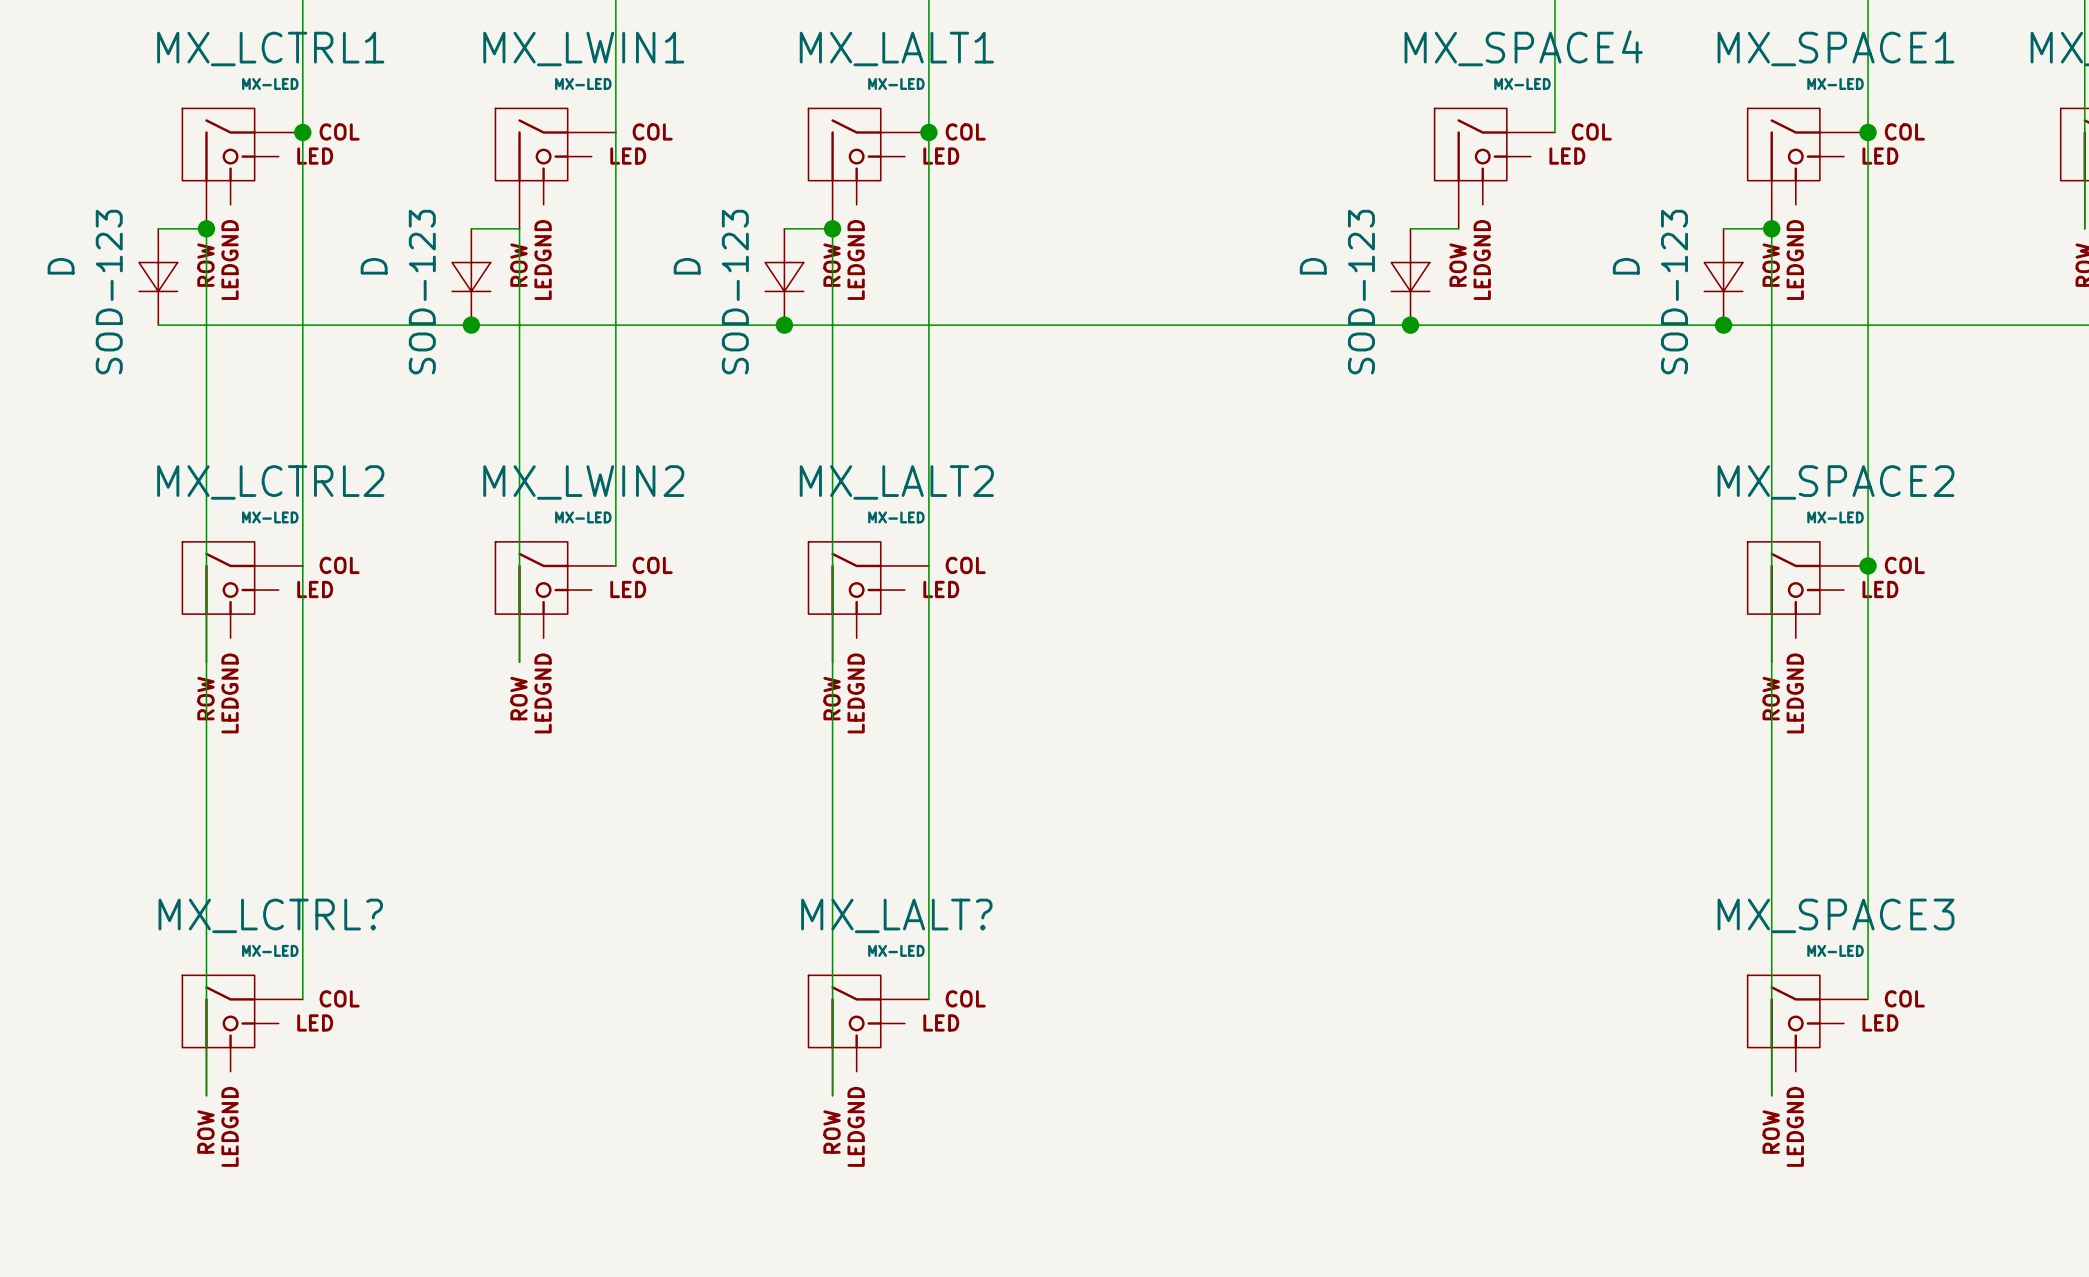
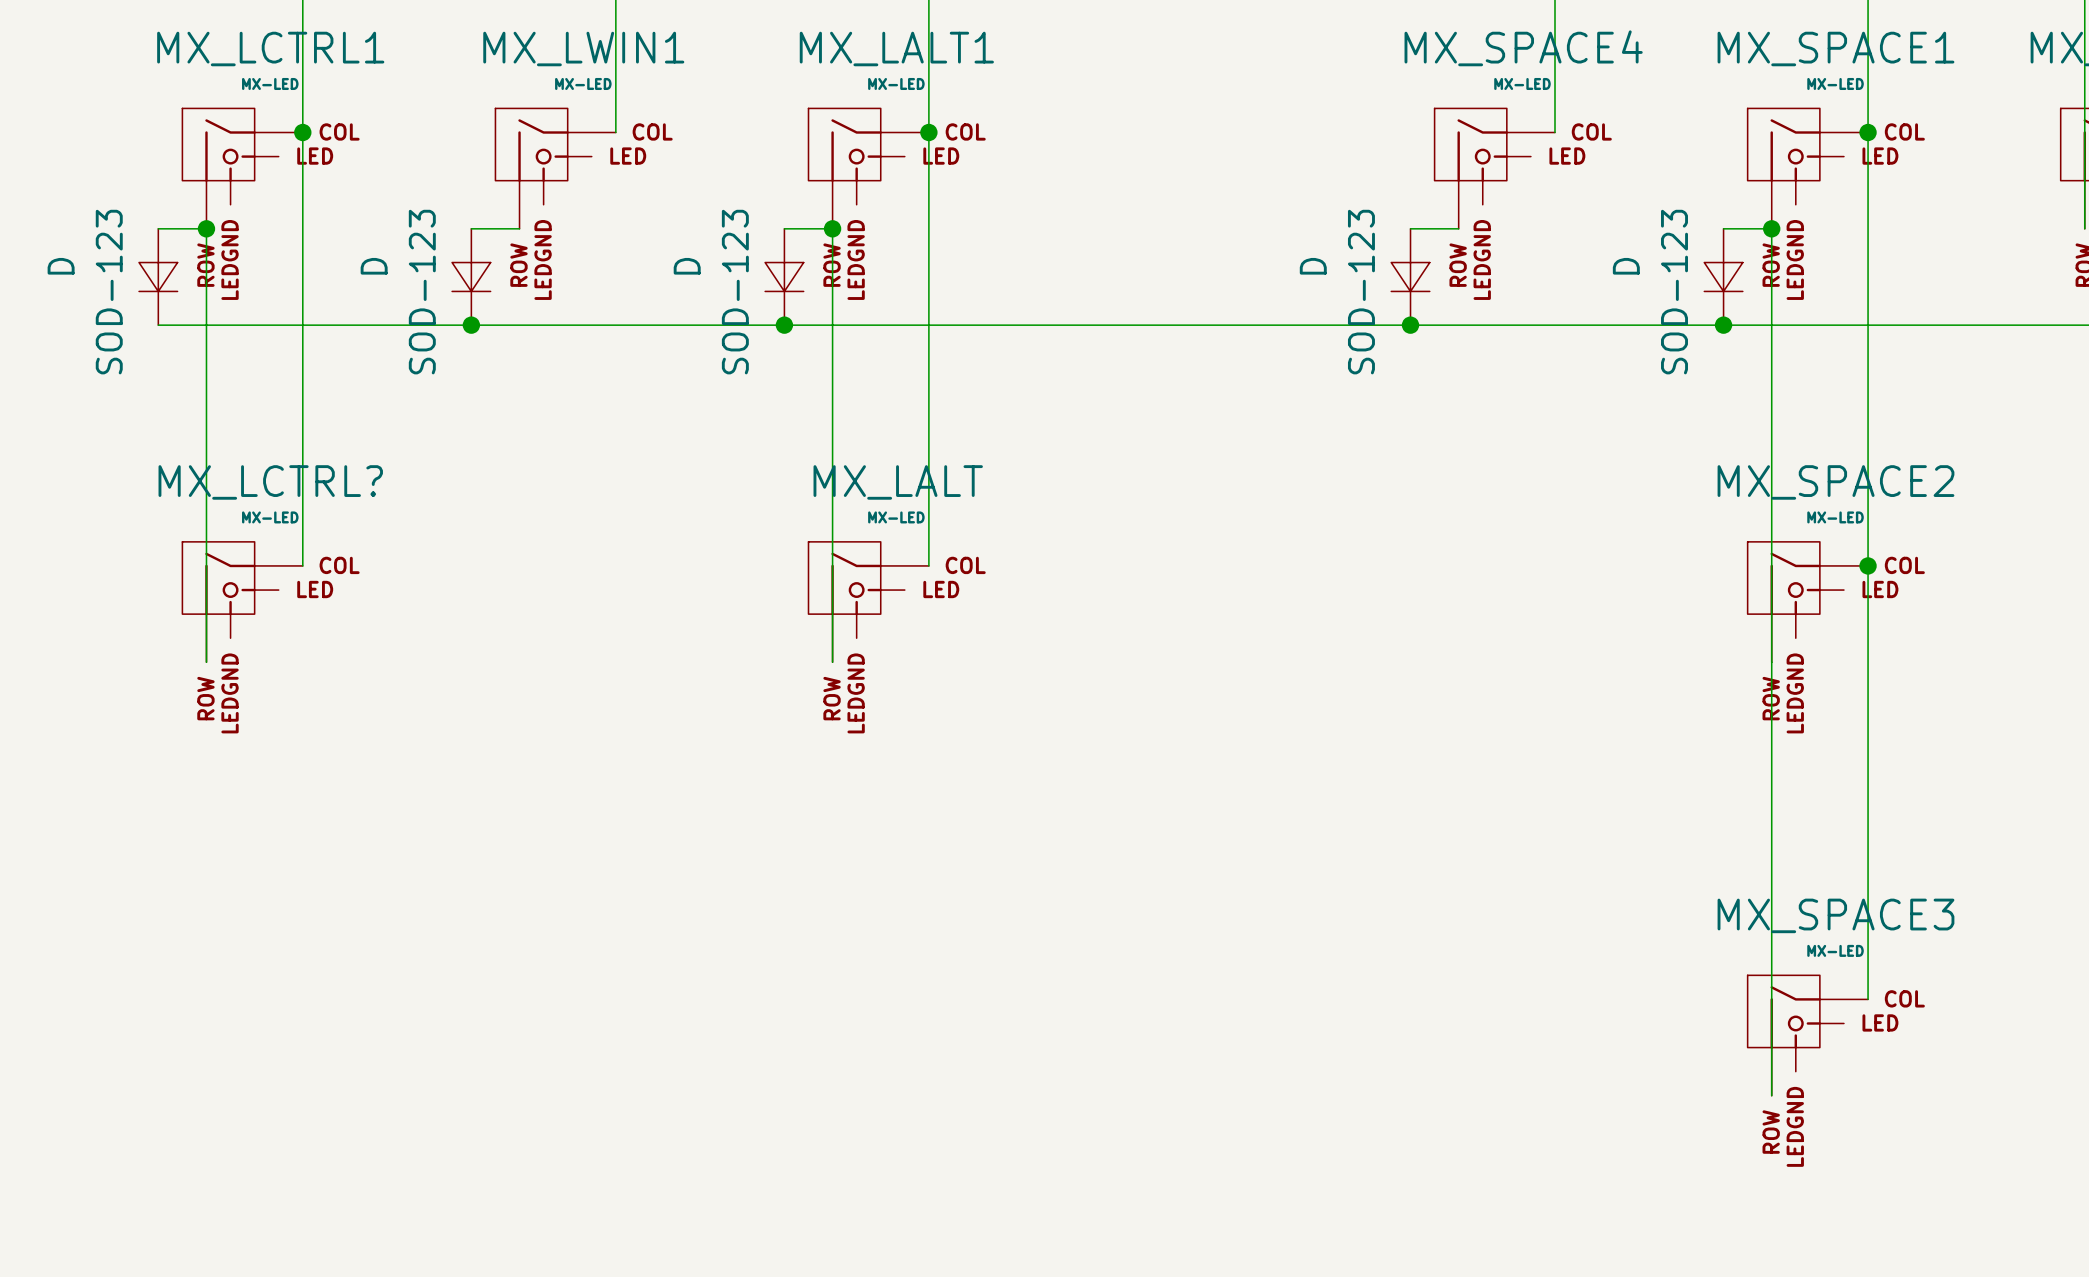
wire: (615, 132) (615, 565) -> none
wire: (519, 228) (519, 662) -> none
MX_LCTRL2 name: MX_LCTRL2 (270, 482) -> MX_LCTRL? (270, 482)
MX_LALT2 name: MX_LALT2 (896, 482) -> MX_LALT (898, 482)
wire: (302, 565) (302, 999) -> none
wire: (928, 565) (928, 999) -> none
MX_LWIN2: MX-LED (555, 602) -> none
wire: (206, 662) (206, 1095) -> none
wire: (832, 662) (832, 1095) -> none
MX_LCTRL?: MX-LED (242, 1035) -> none
MX_LALT?: MX-LED (868, 1035) -> none

